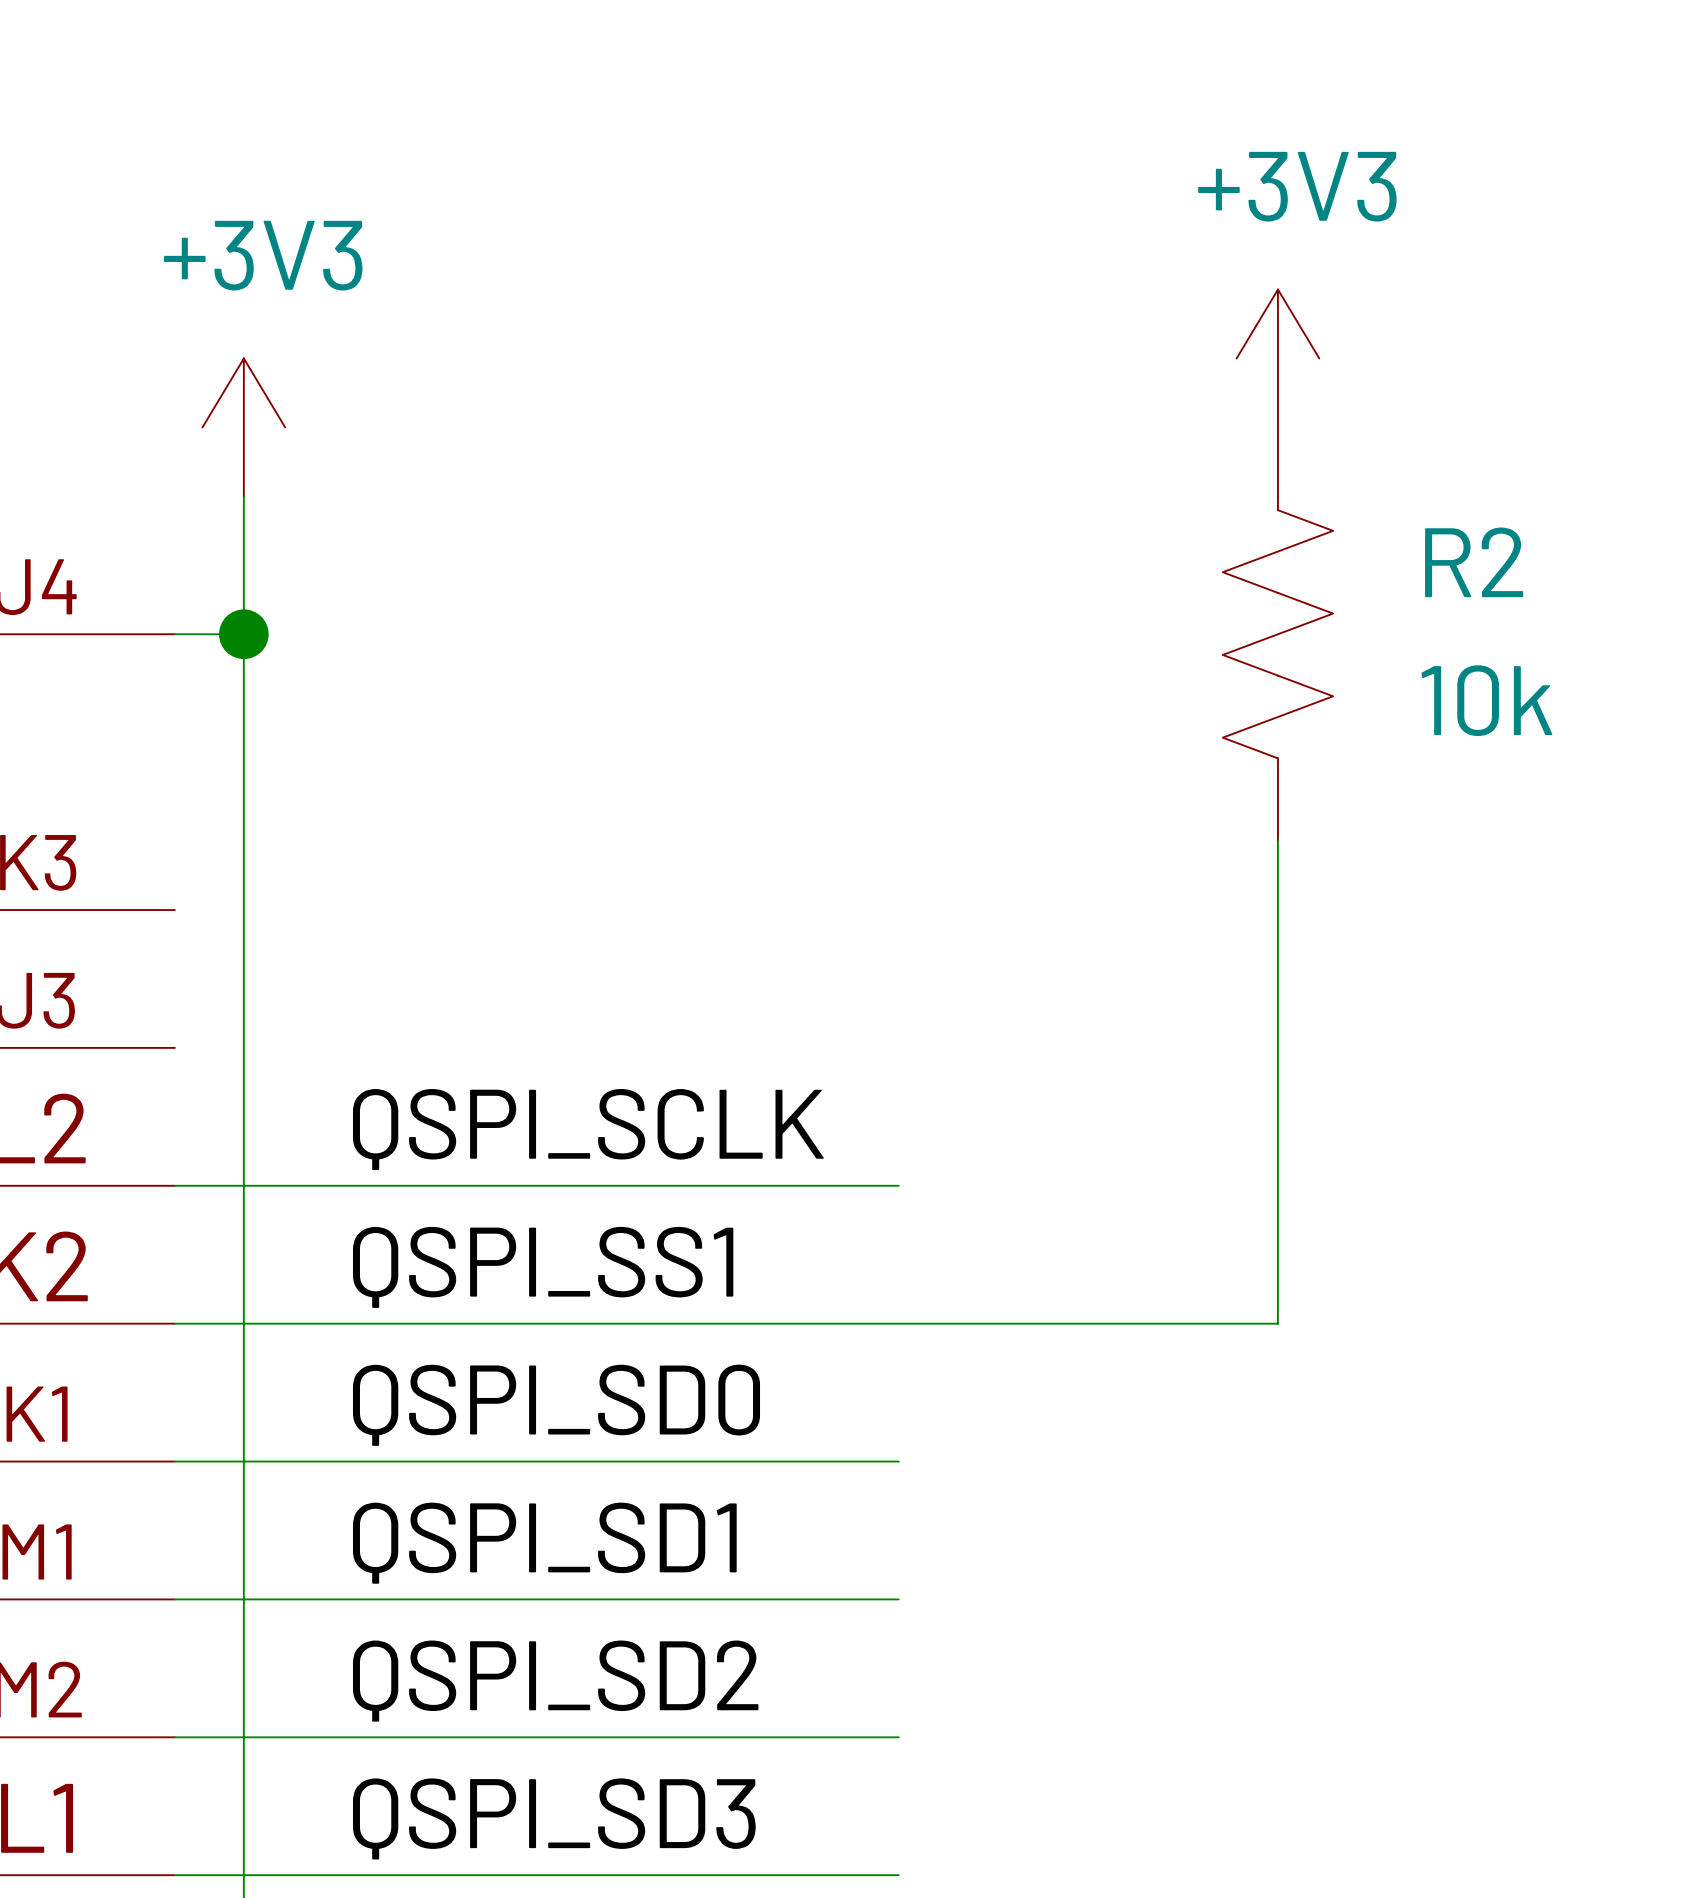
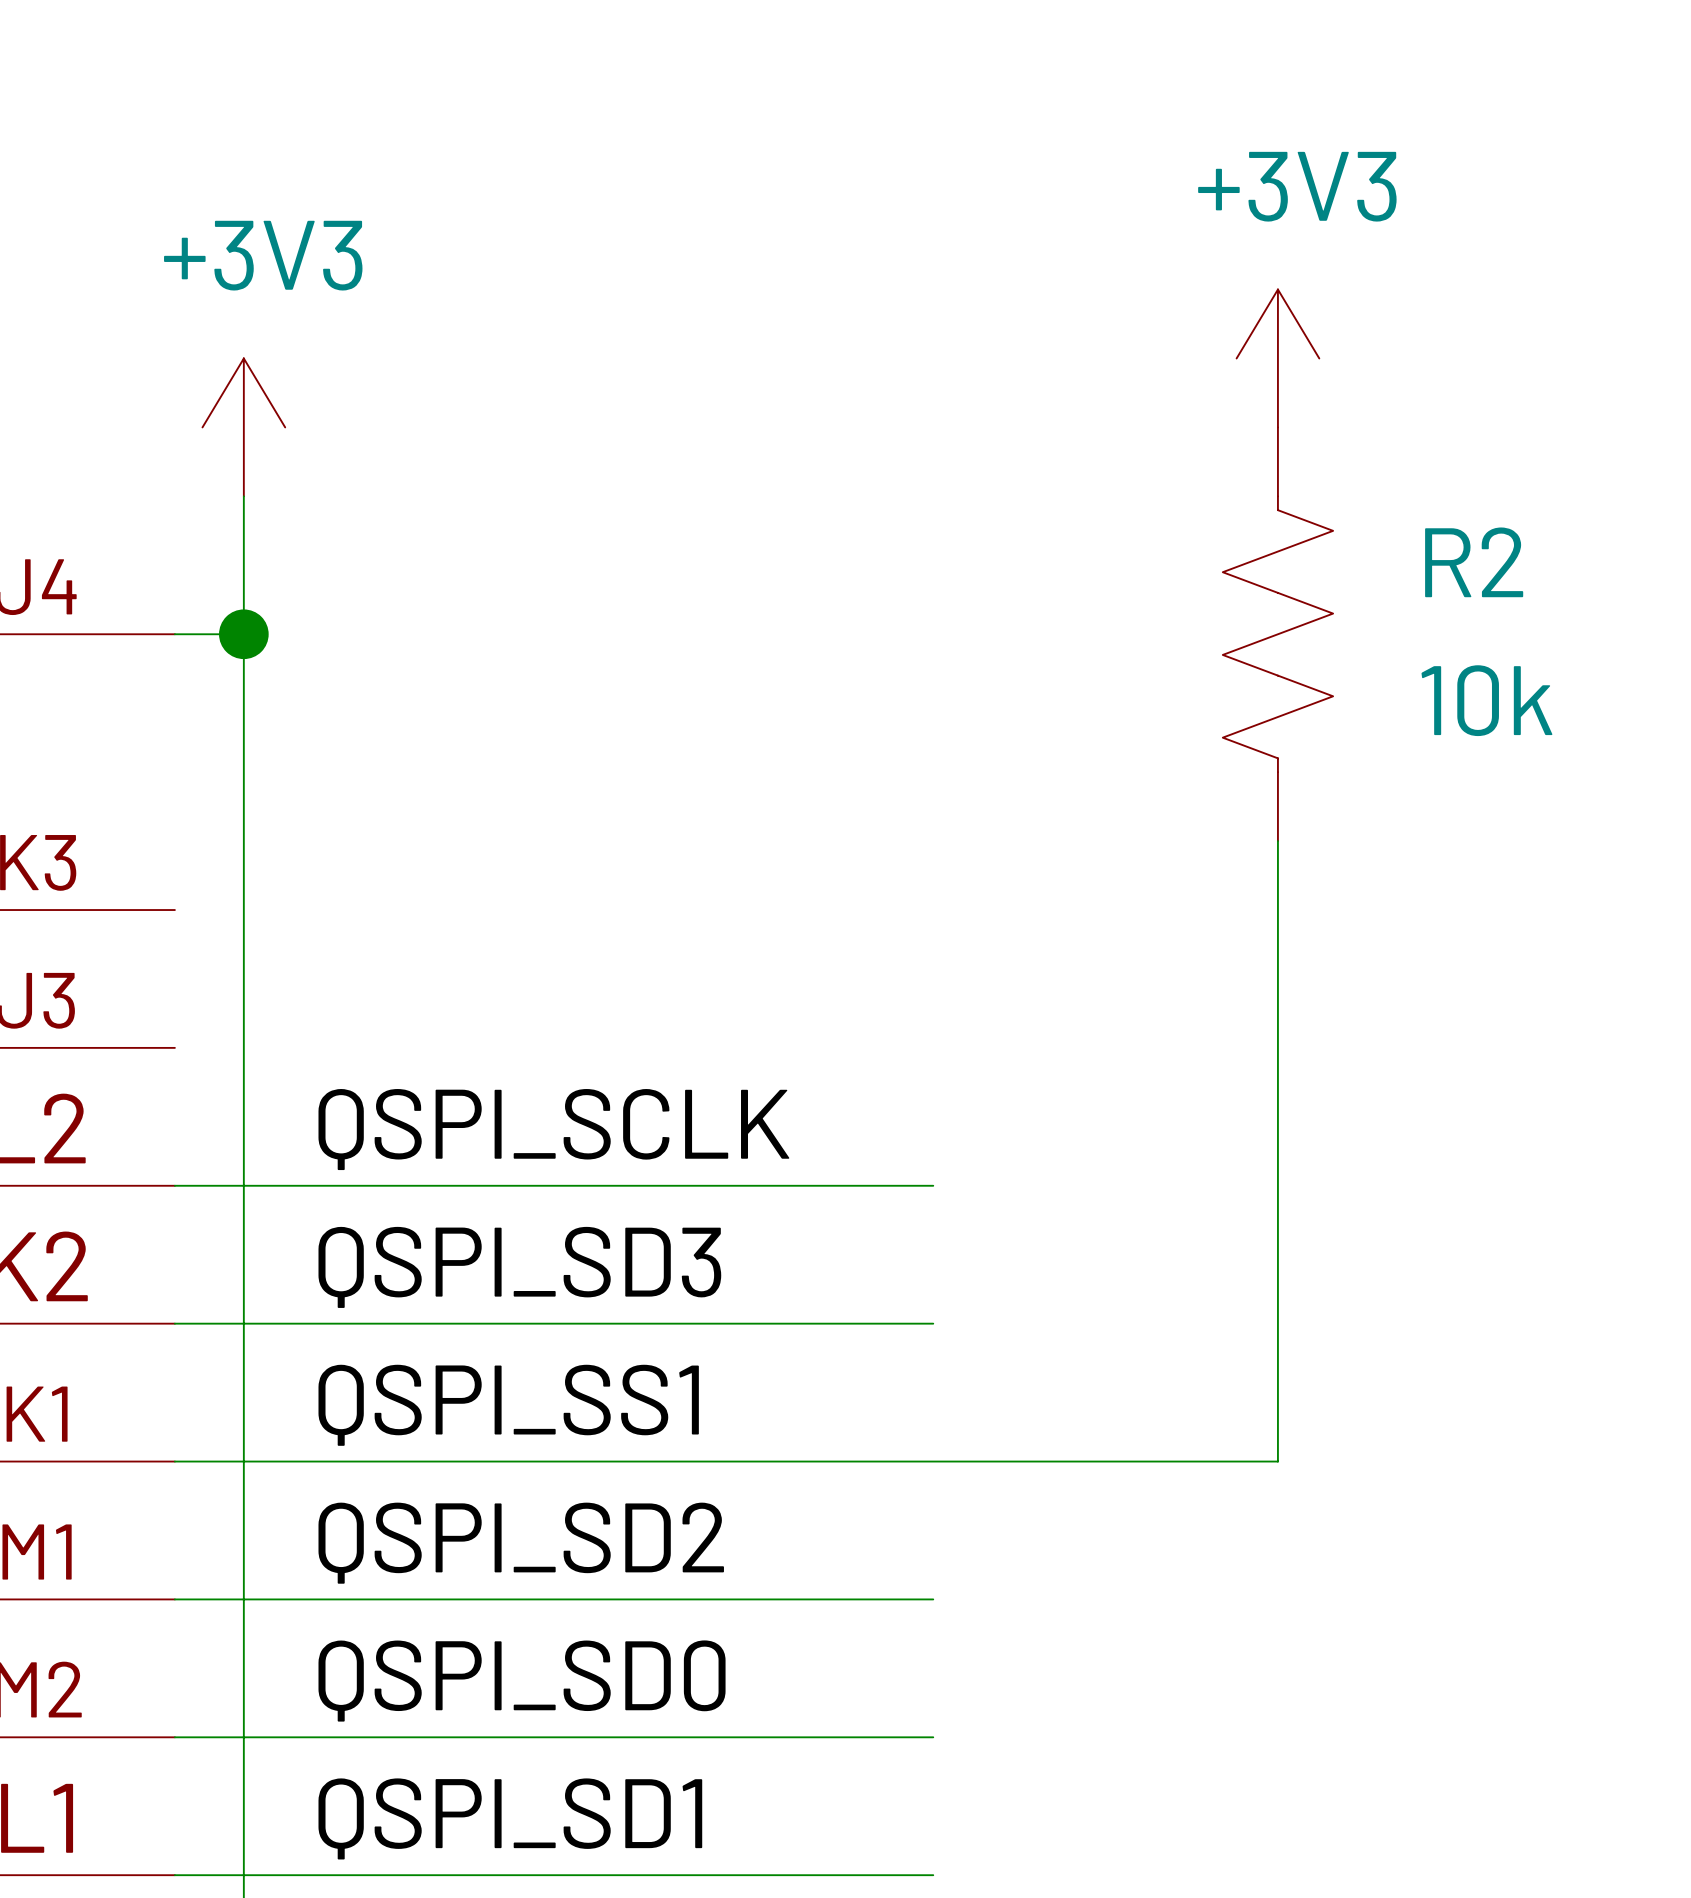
label position: QSPI_SCLK (588, 1129) -> QSPI_SCLK (553, 1129)
wire: none -> (898, 1185) (933, 1185)
label position: QSPI_SS1 (543, 1267) -> QSPI_SS1 (508, 1405)
wire: (933, 1323) (1277, 1323) -> (898, 1461) (1277, 1461) (1277, 1323)
label position: QSPI_SD0 (556, 1405) -> QSPI_SD0 (522, 1681)
label position: QSPI_SD1 (544, 1543) -> QSPI_SD1 (510, 1818)
wire: none -> (898, 1599) (933, 1599)
label position: QSPI_SD2 (555, 1681) -> QSPI_SD2 (521, 1543)
wire: none -> (898, 1737) (933, 1737)
label position: QSPI_SD3 (554, 1818) -> QSPI_SD3 (519, 1267)
wire: none -> (898, 1875) (933, 1875)

